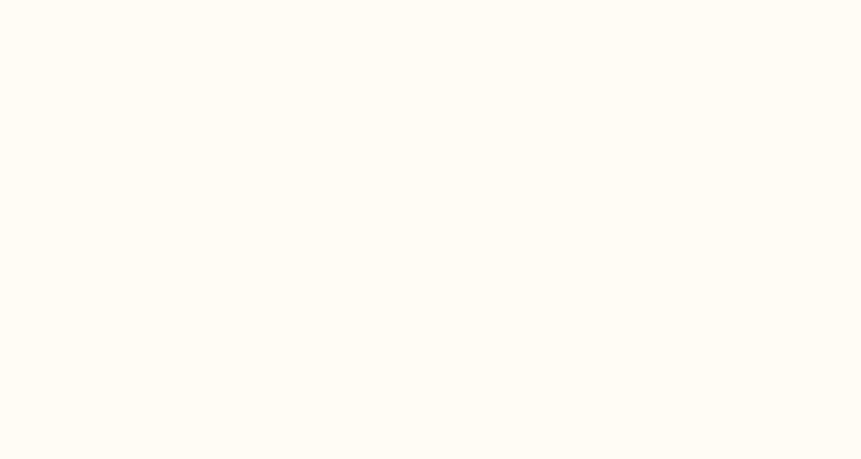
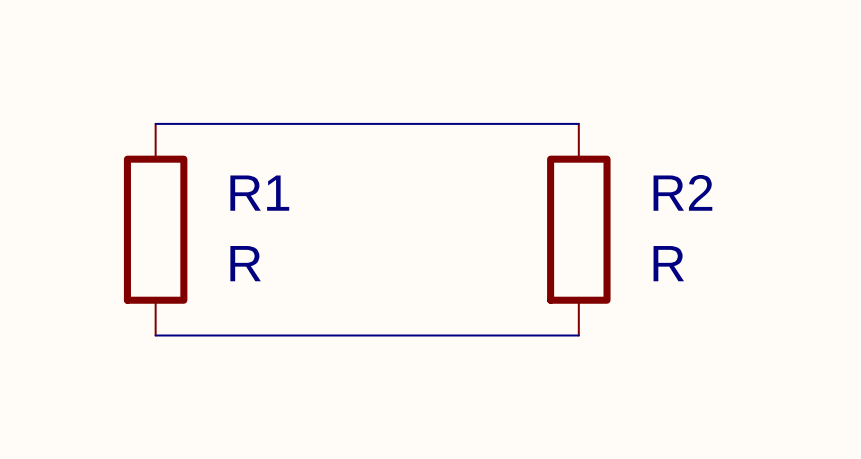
wire: none -> (155, 123) (578, 123)
R1: none -> R (155, 229)
R2: none -> R (578, 229)
wire: none -> (155, 335) (578, 335)

